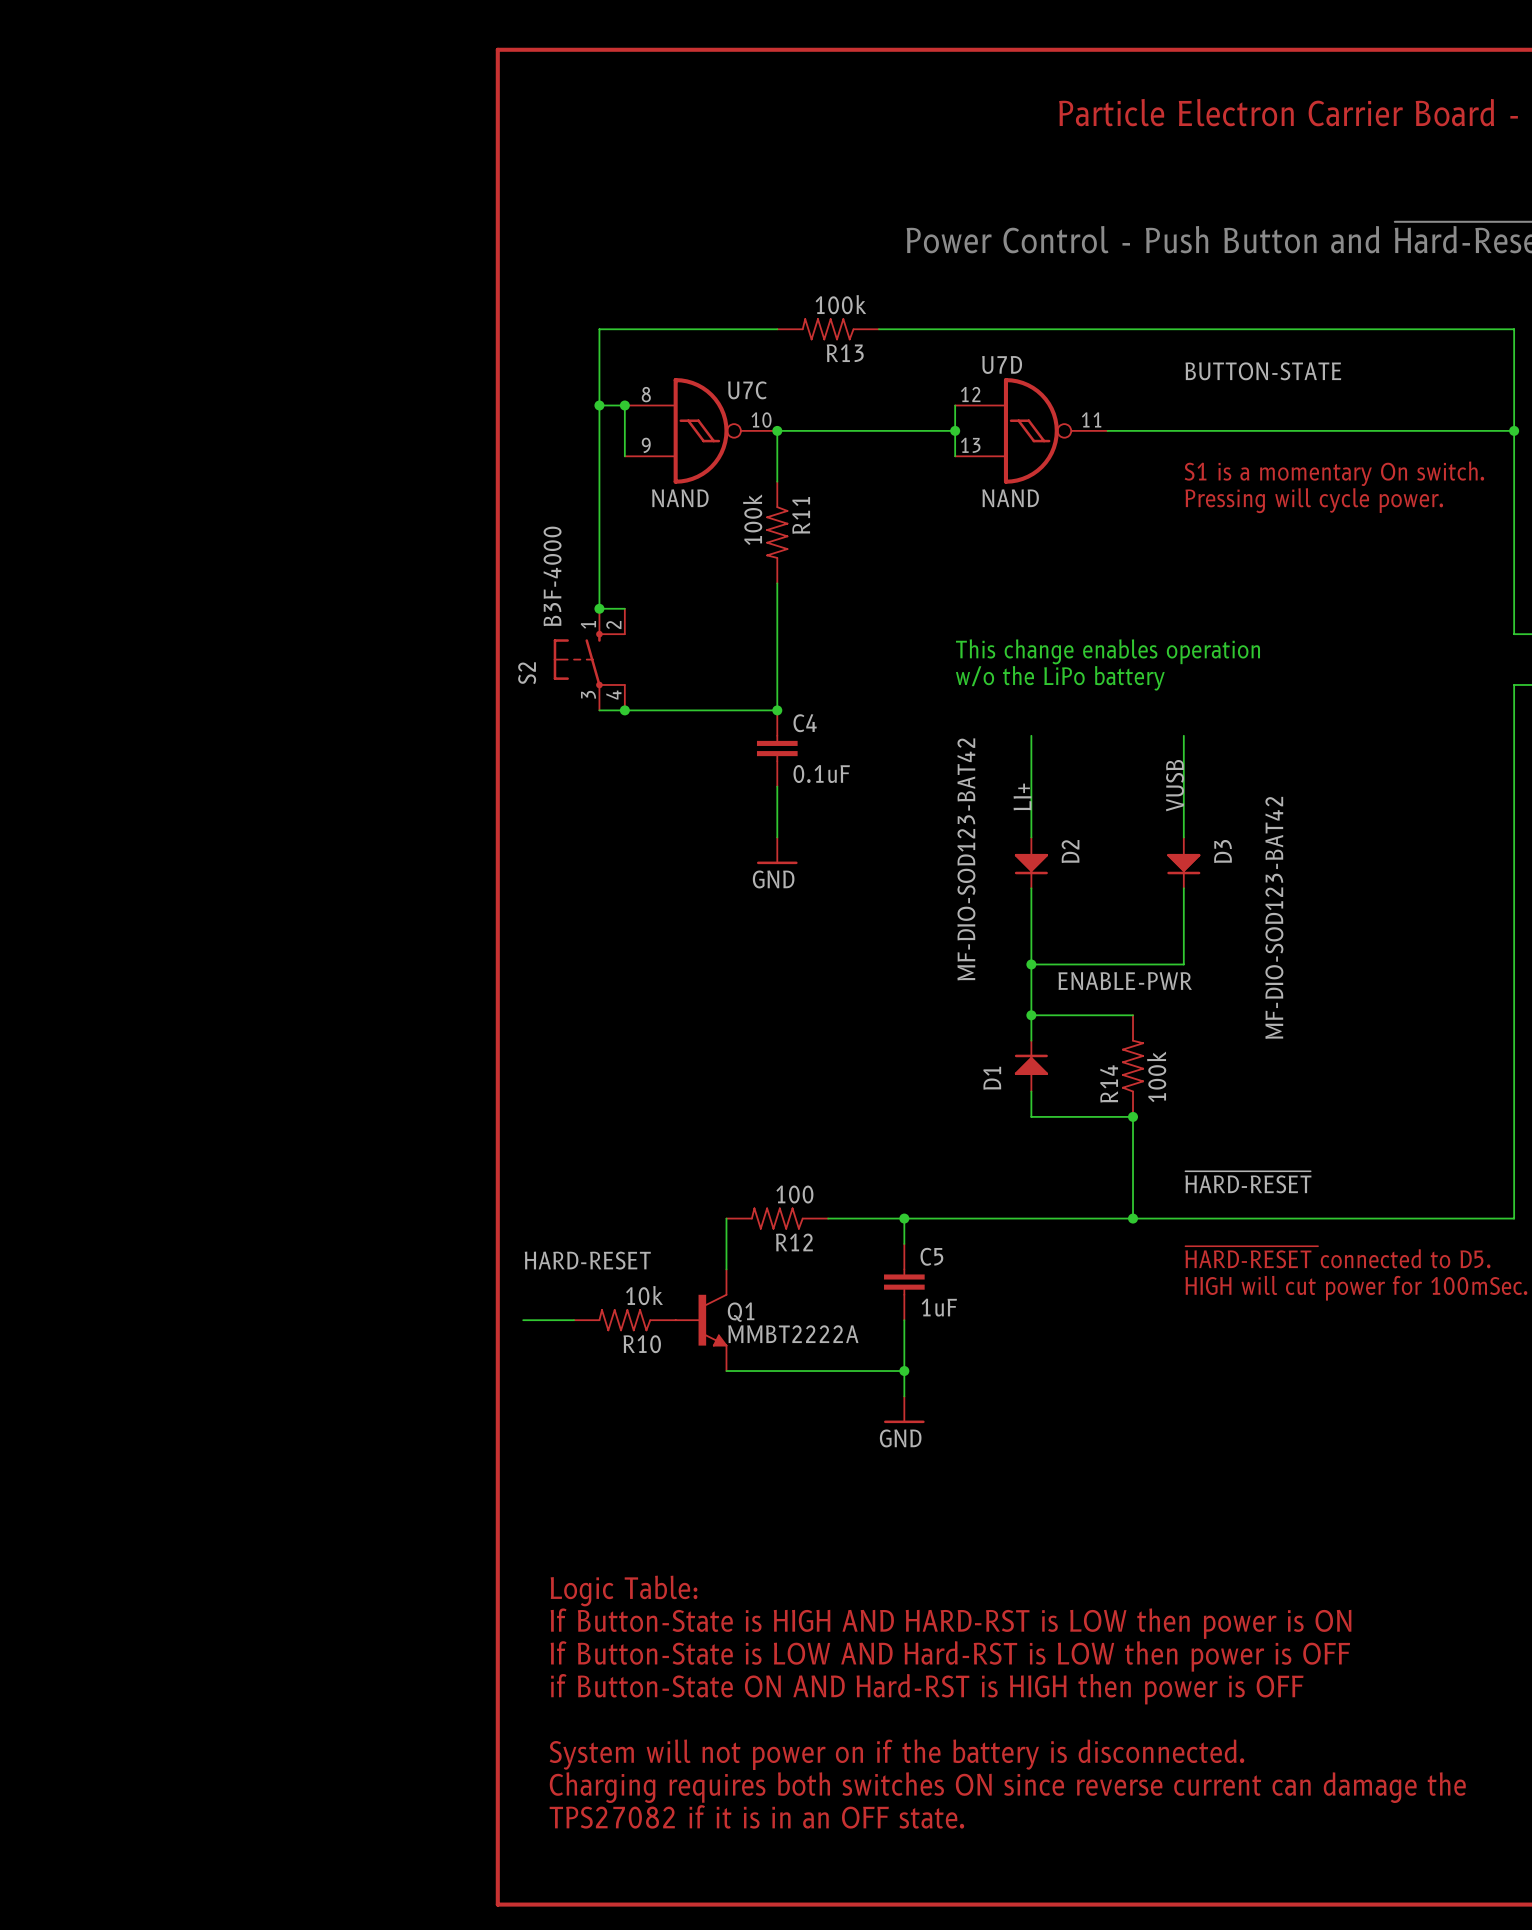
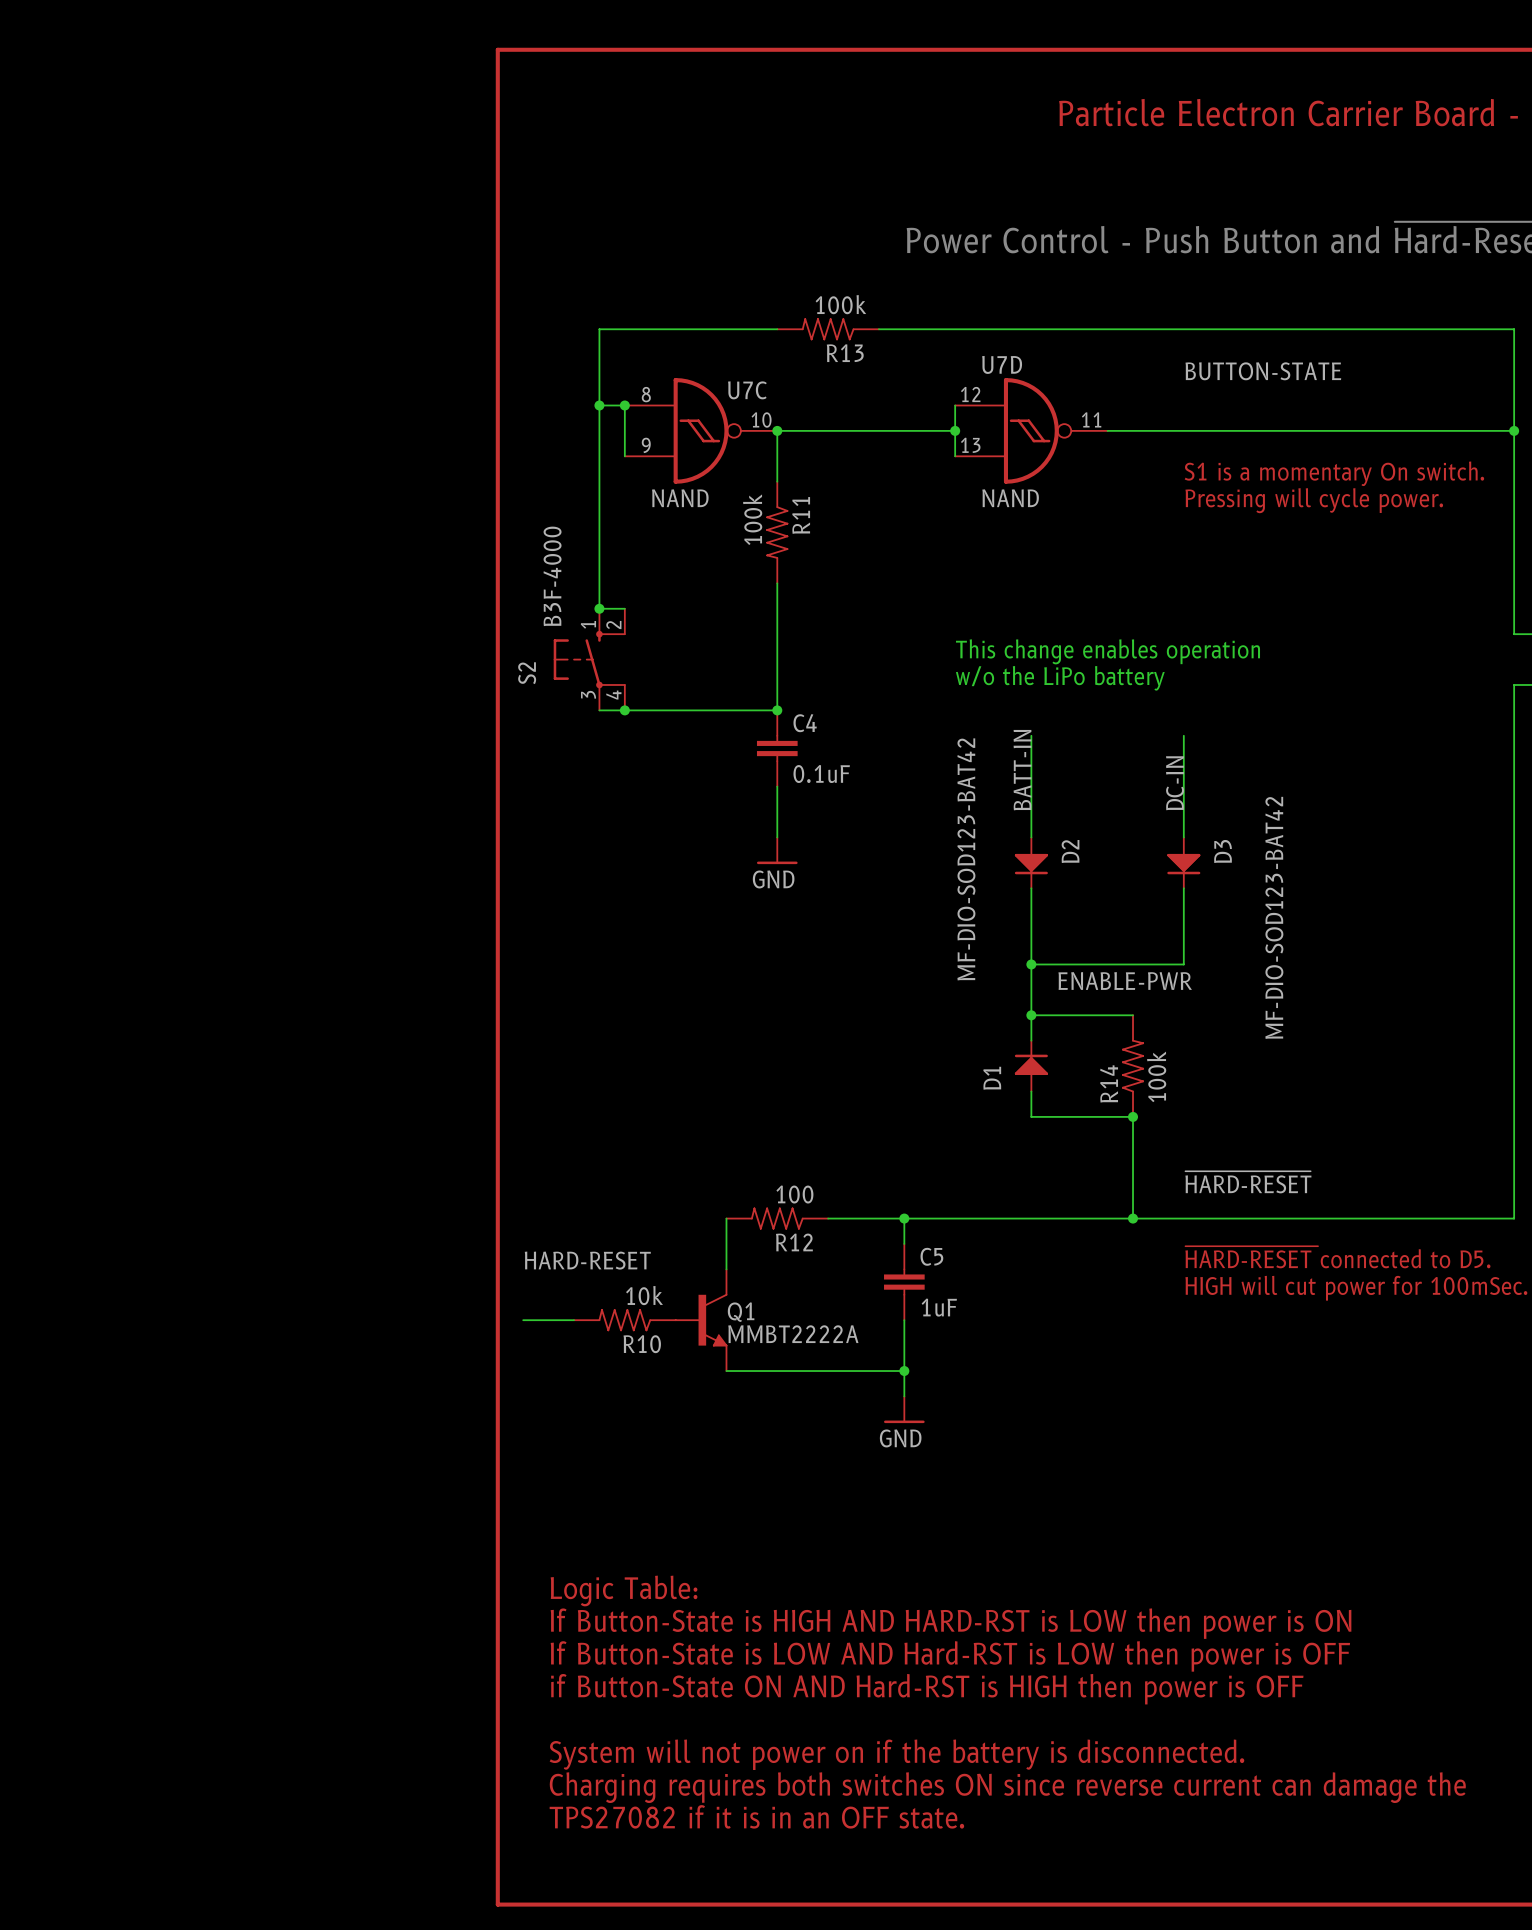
label: VUSB (1175, 785) -> DC-IN (1175, 783)
label: LI+ (1022, 796) -> BATT-IN (1022, 770)

